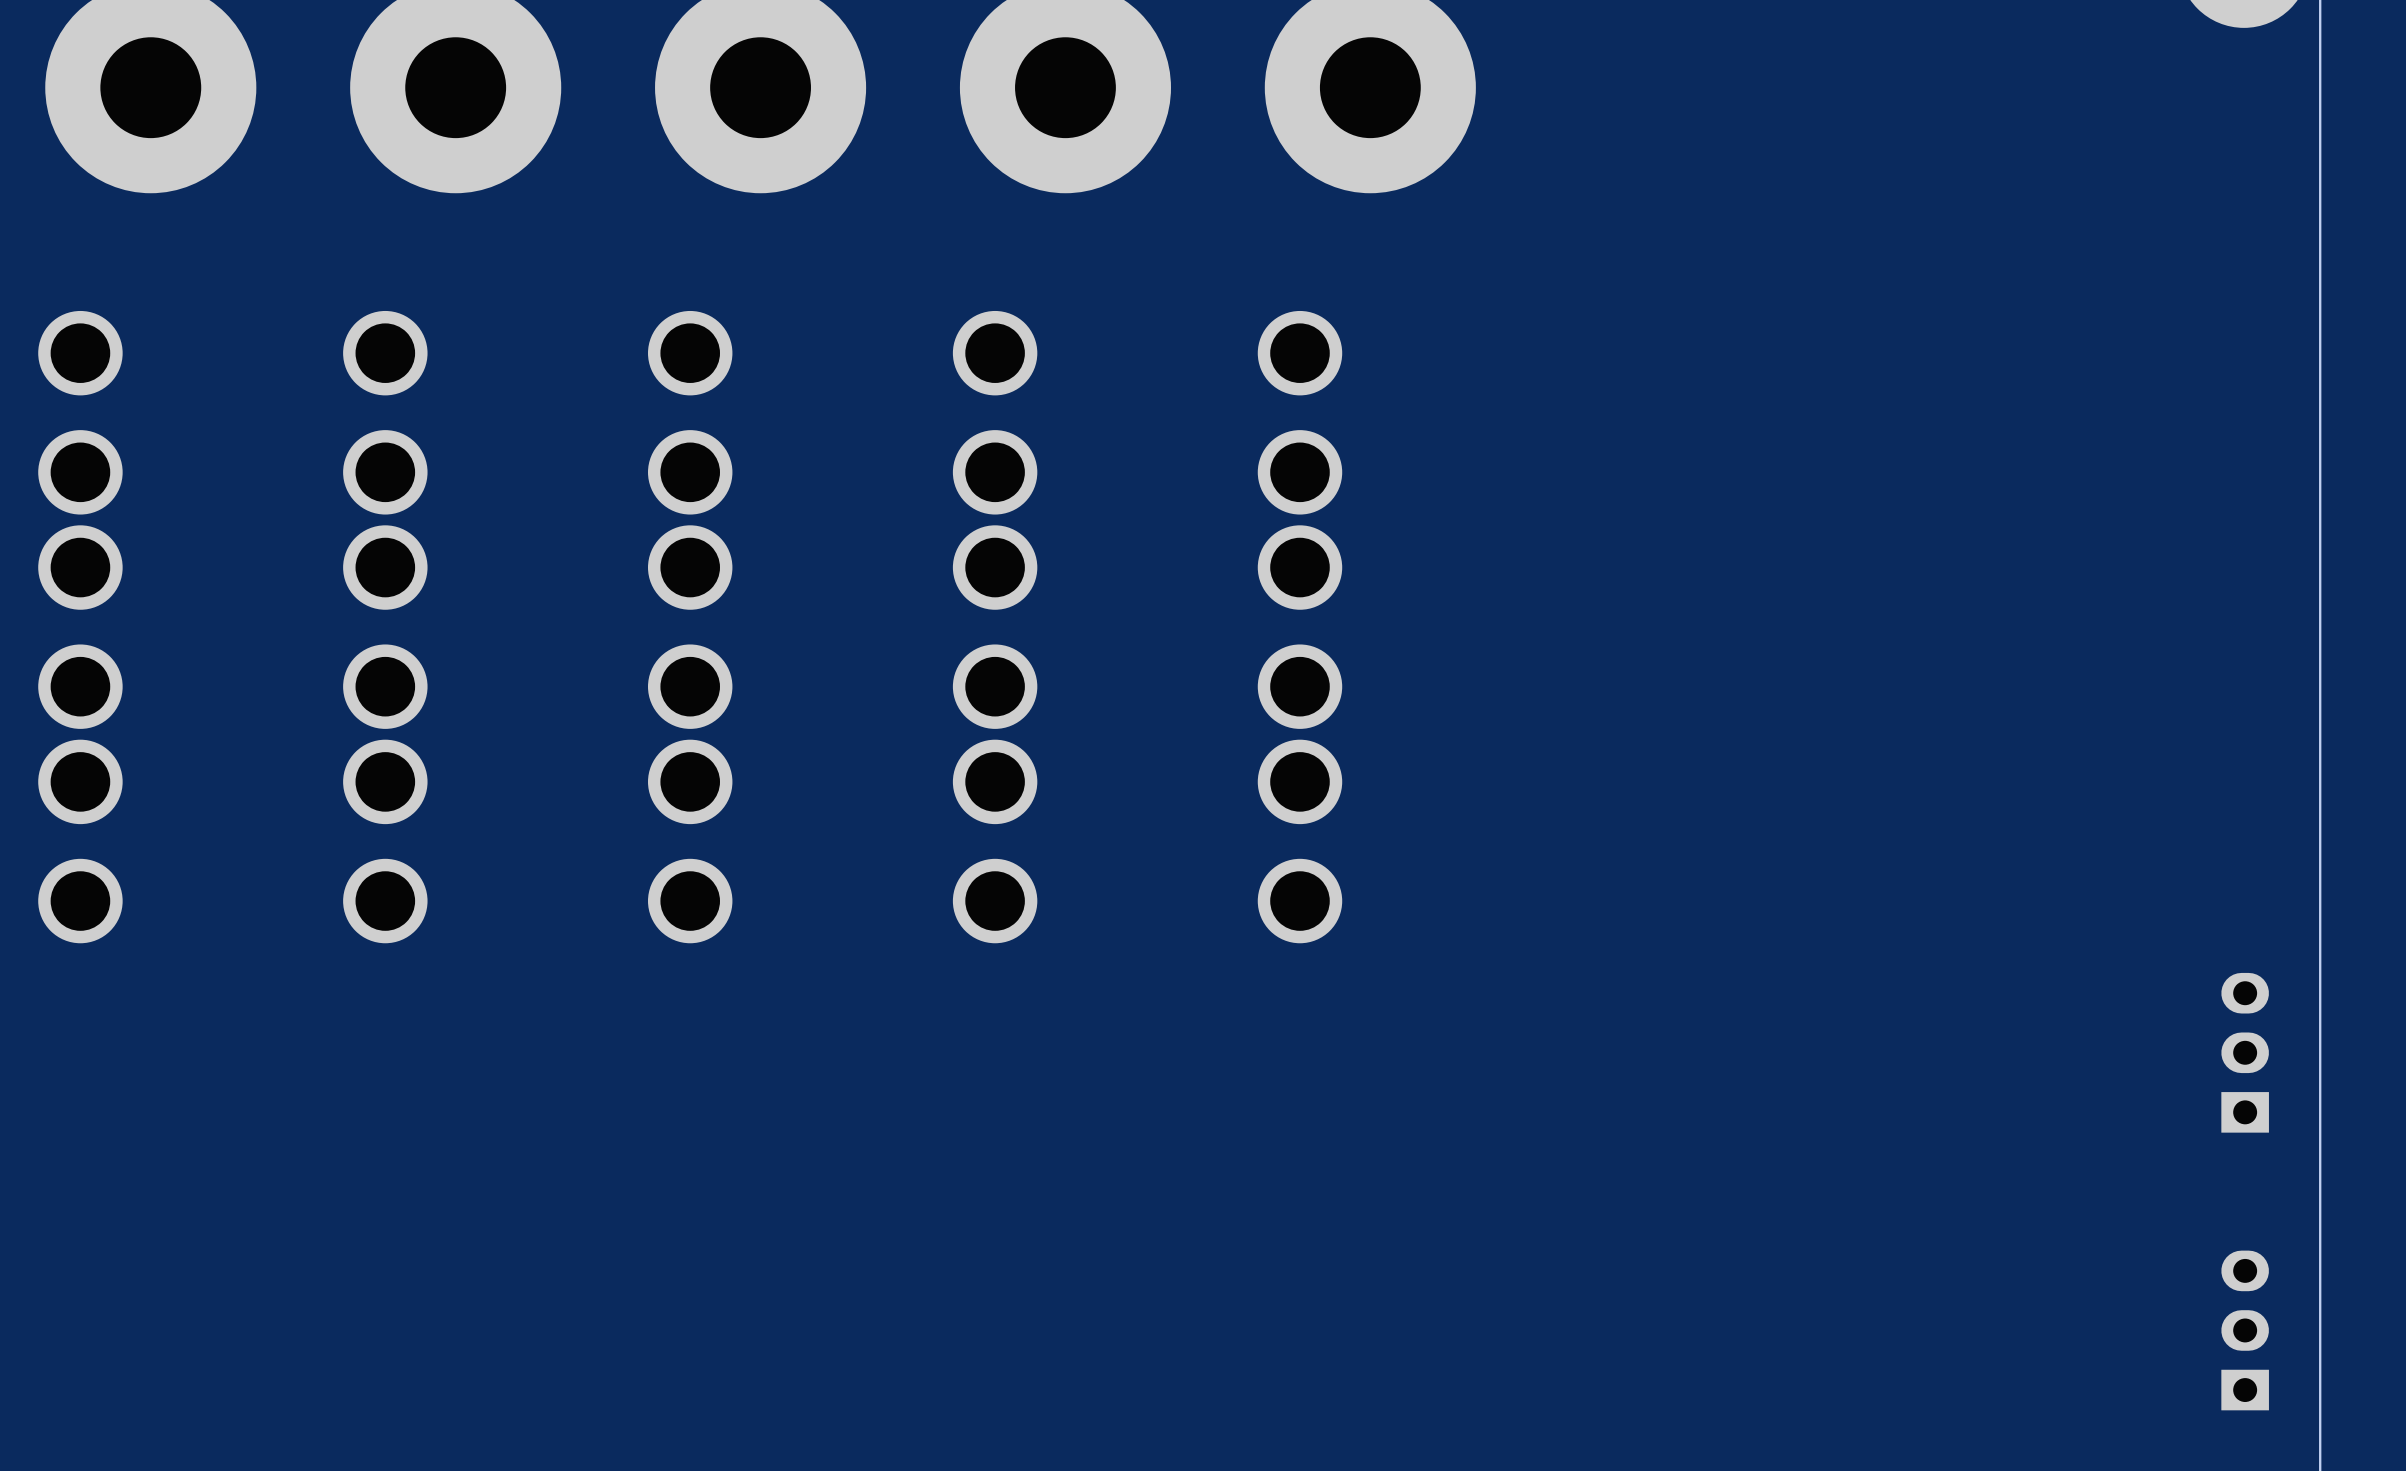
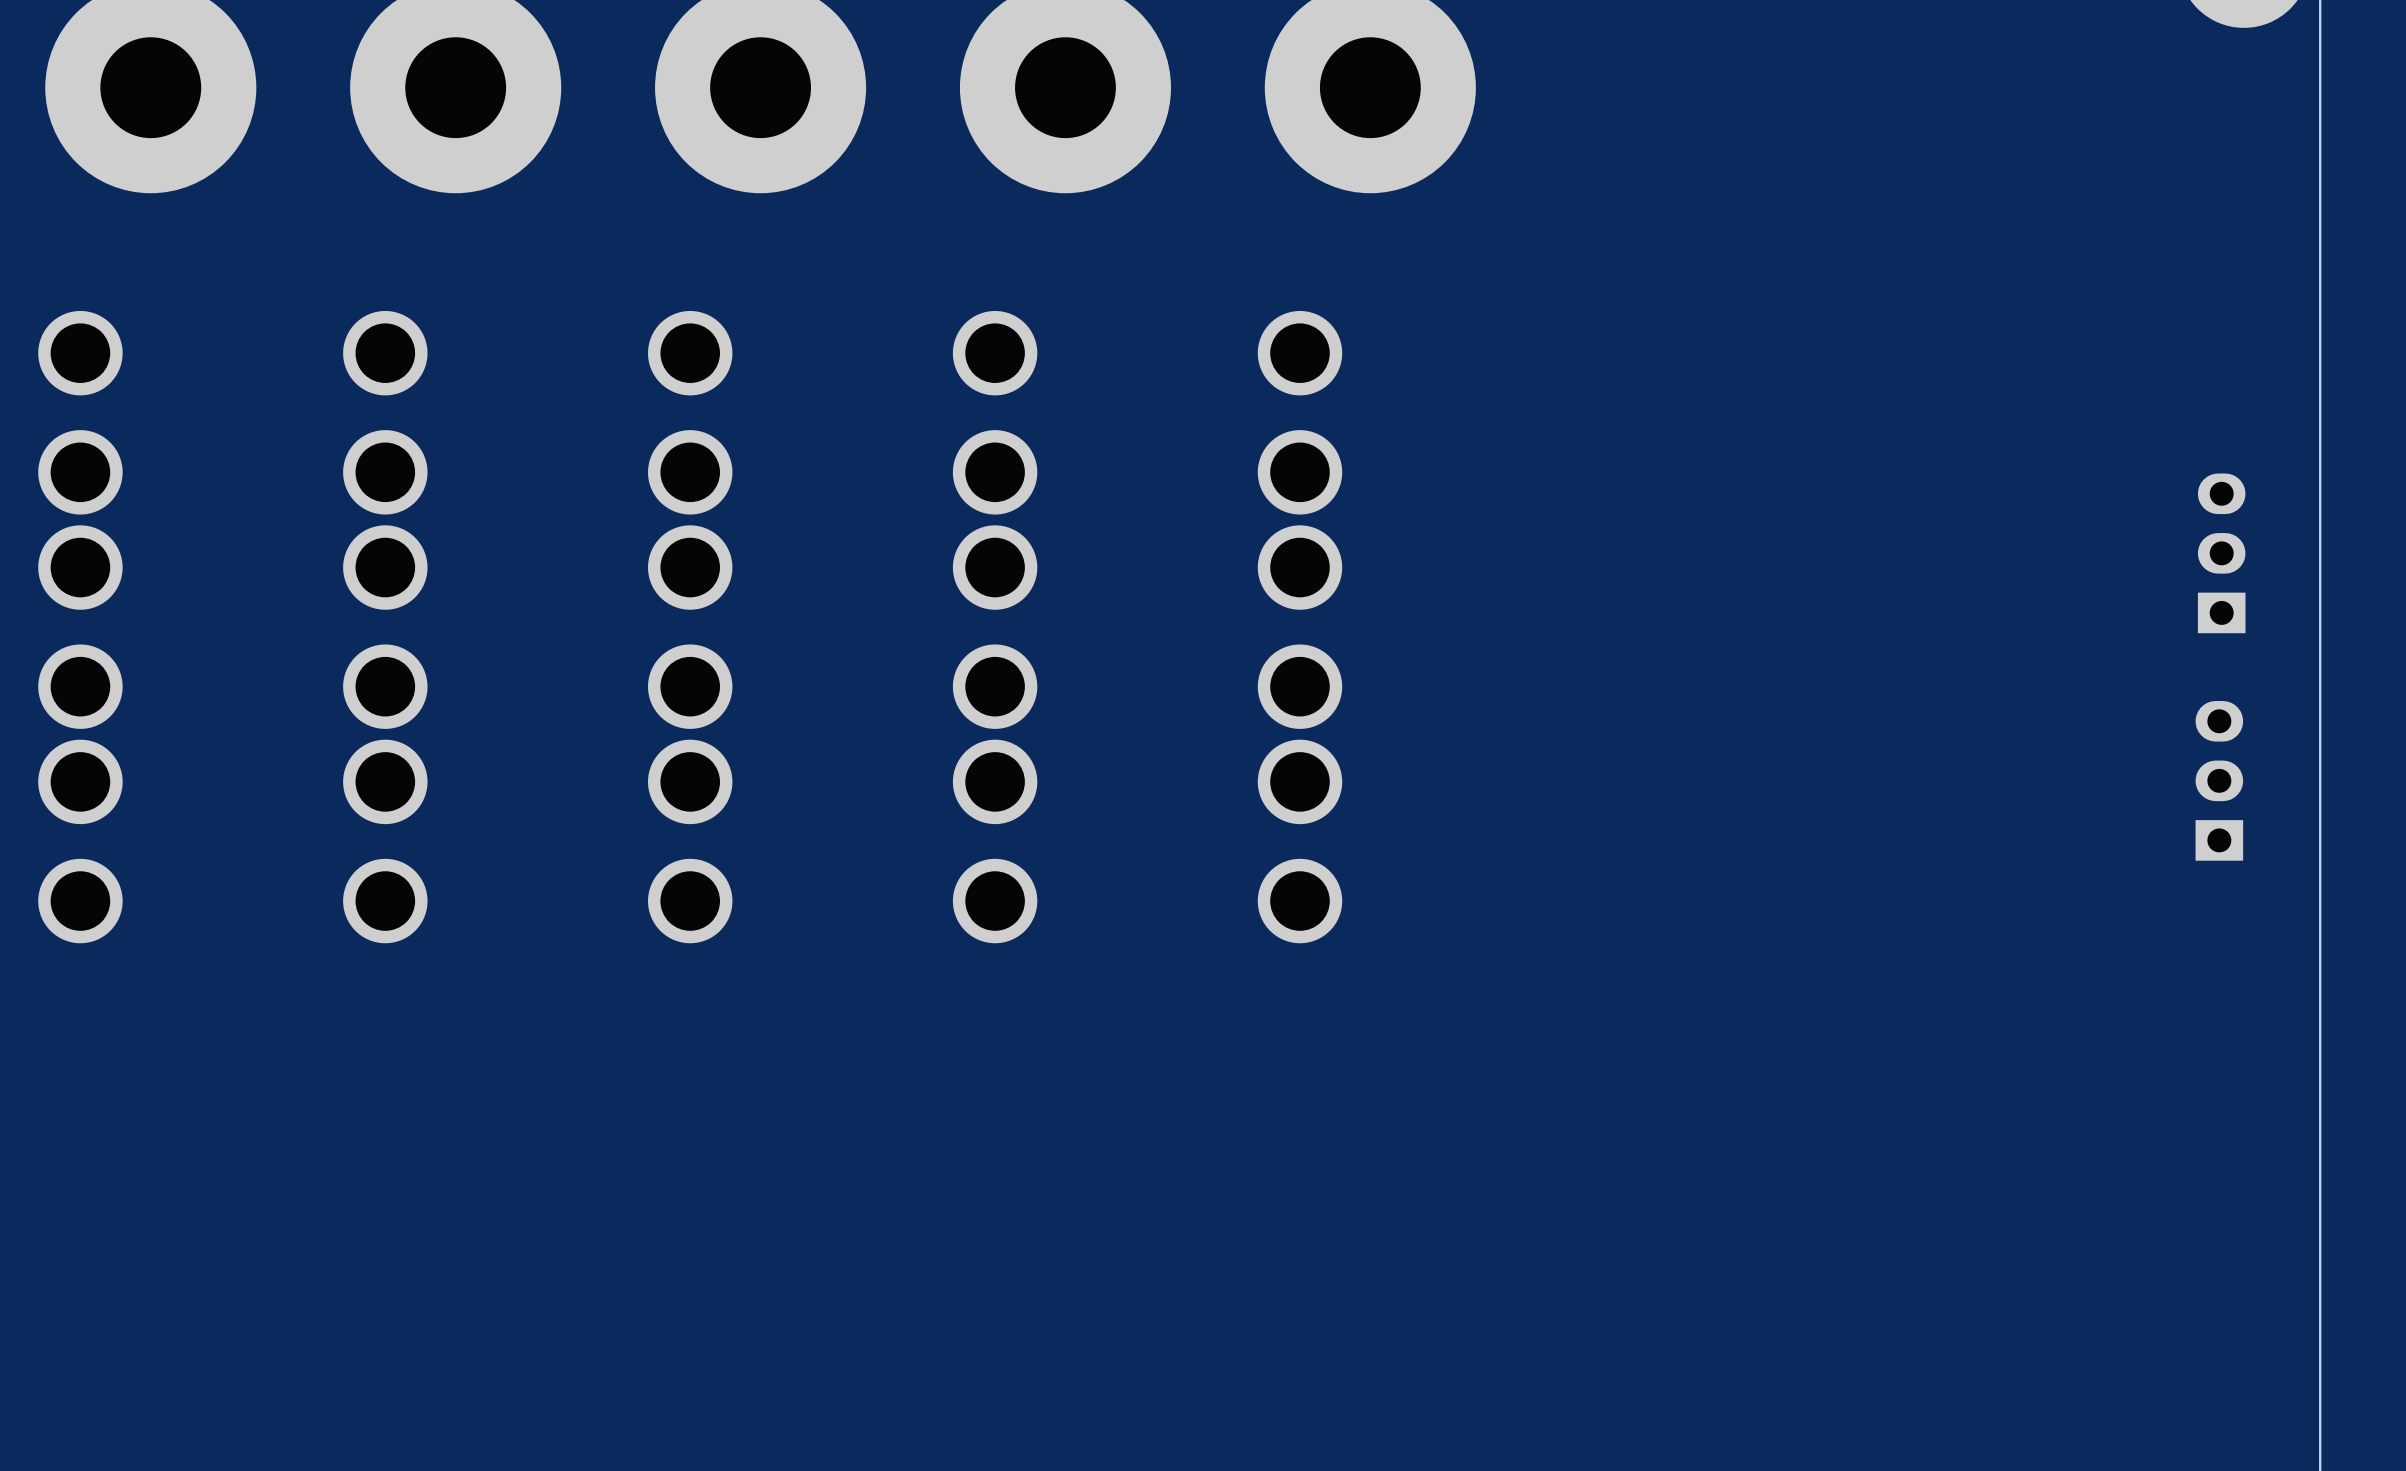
part: none -> (2221, 553)
part: none -> (2219, 780)
part: (2245, 1052) -> none
part: (2245, 1330) -> none

